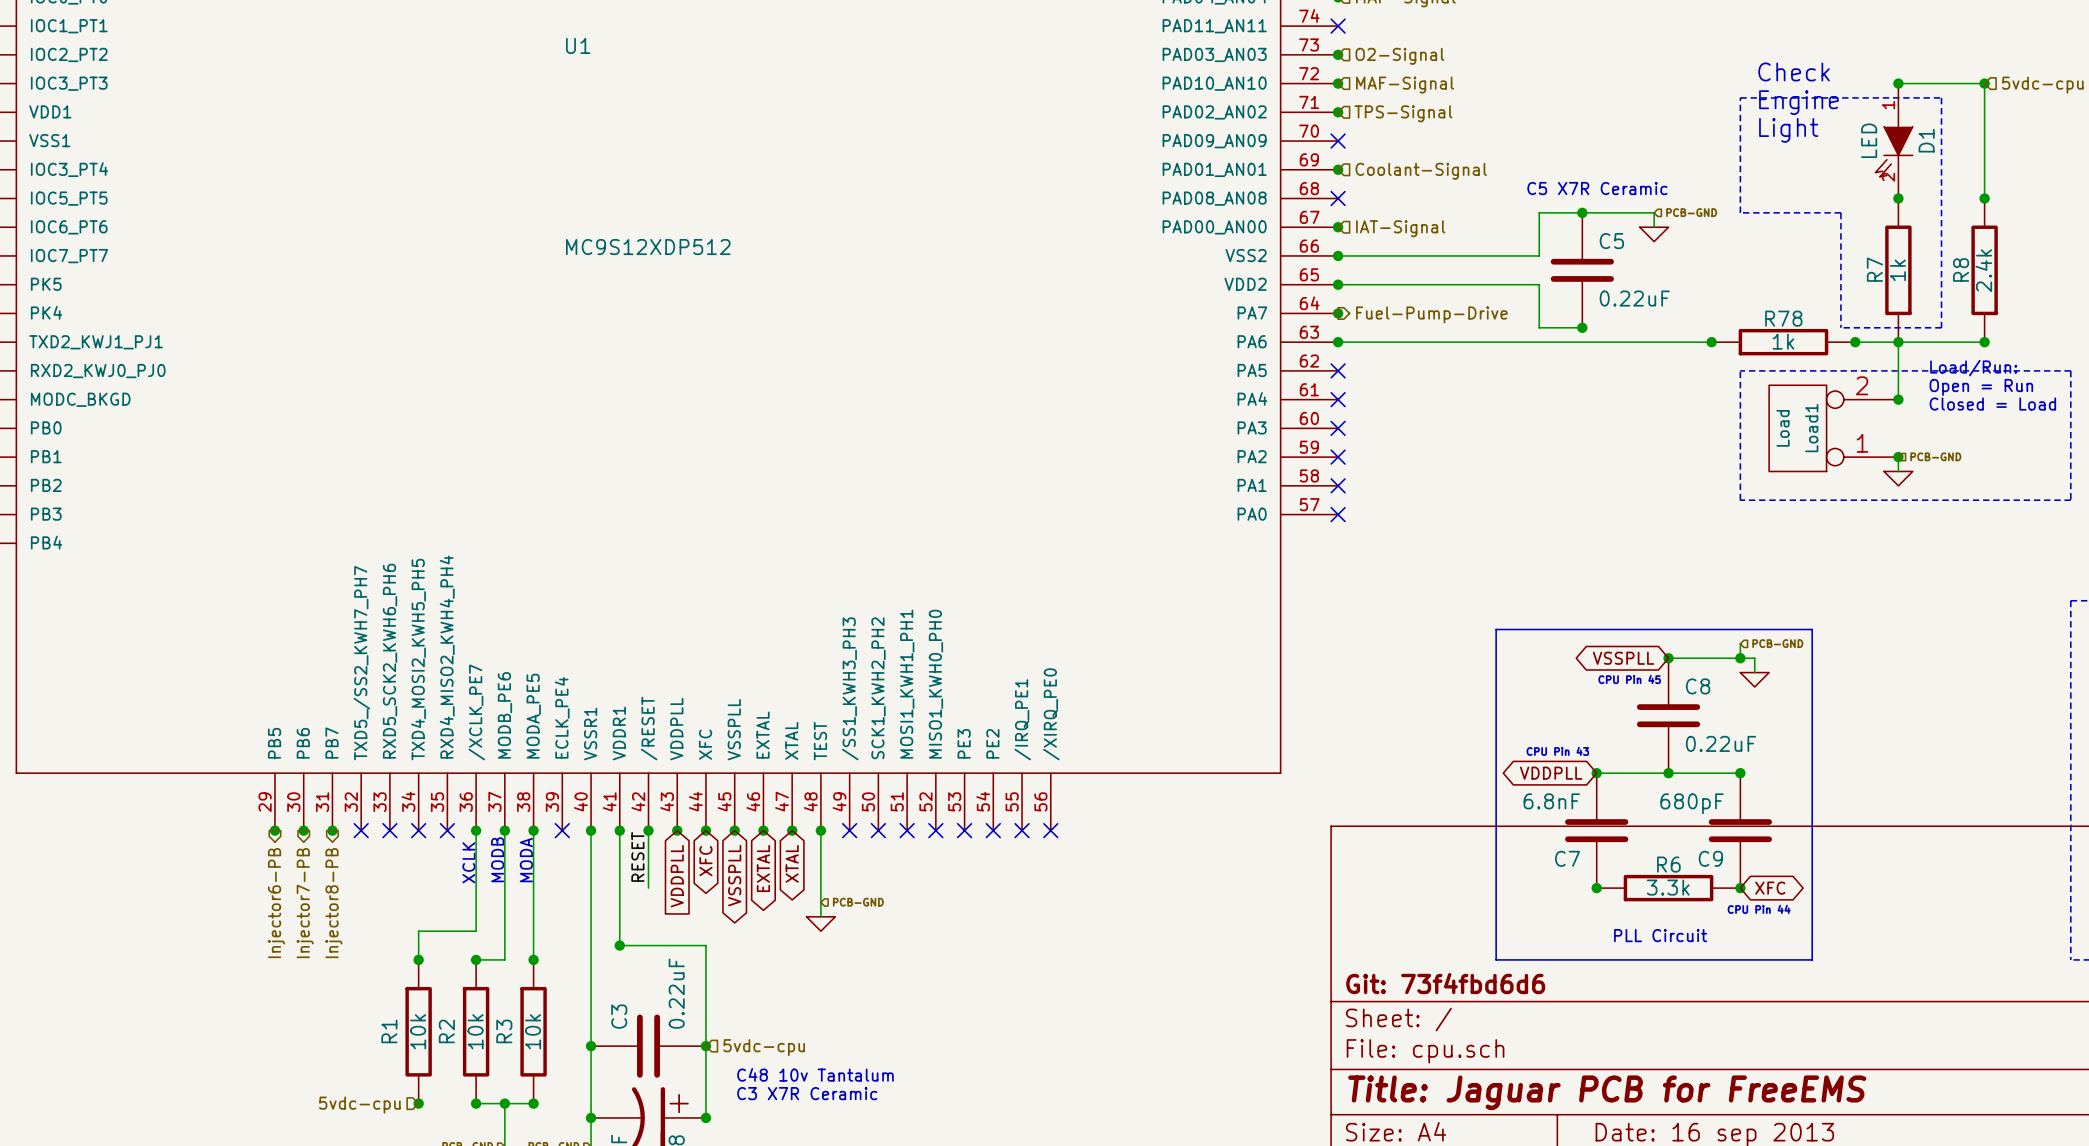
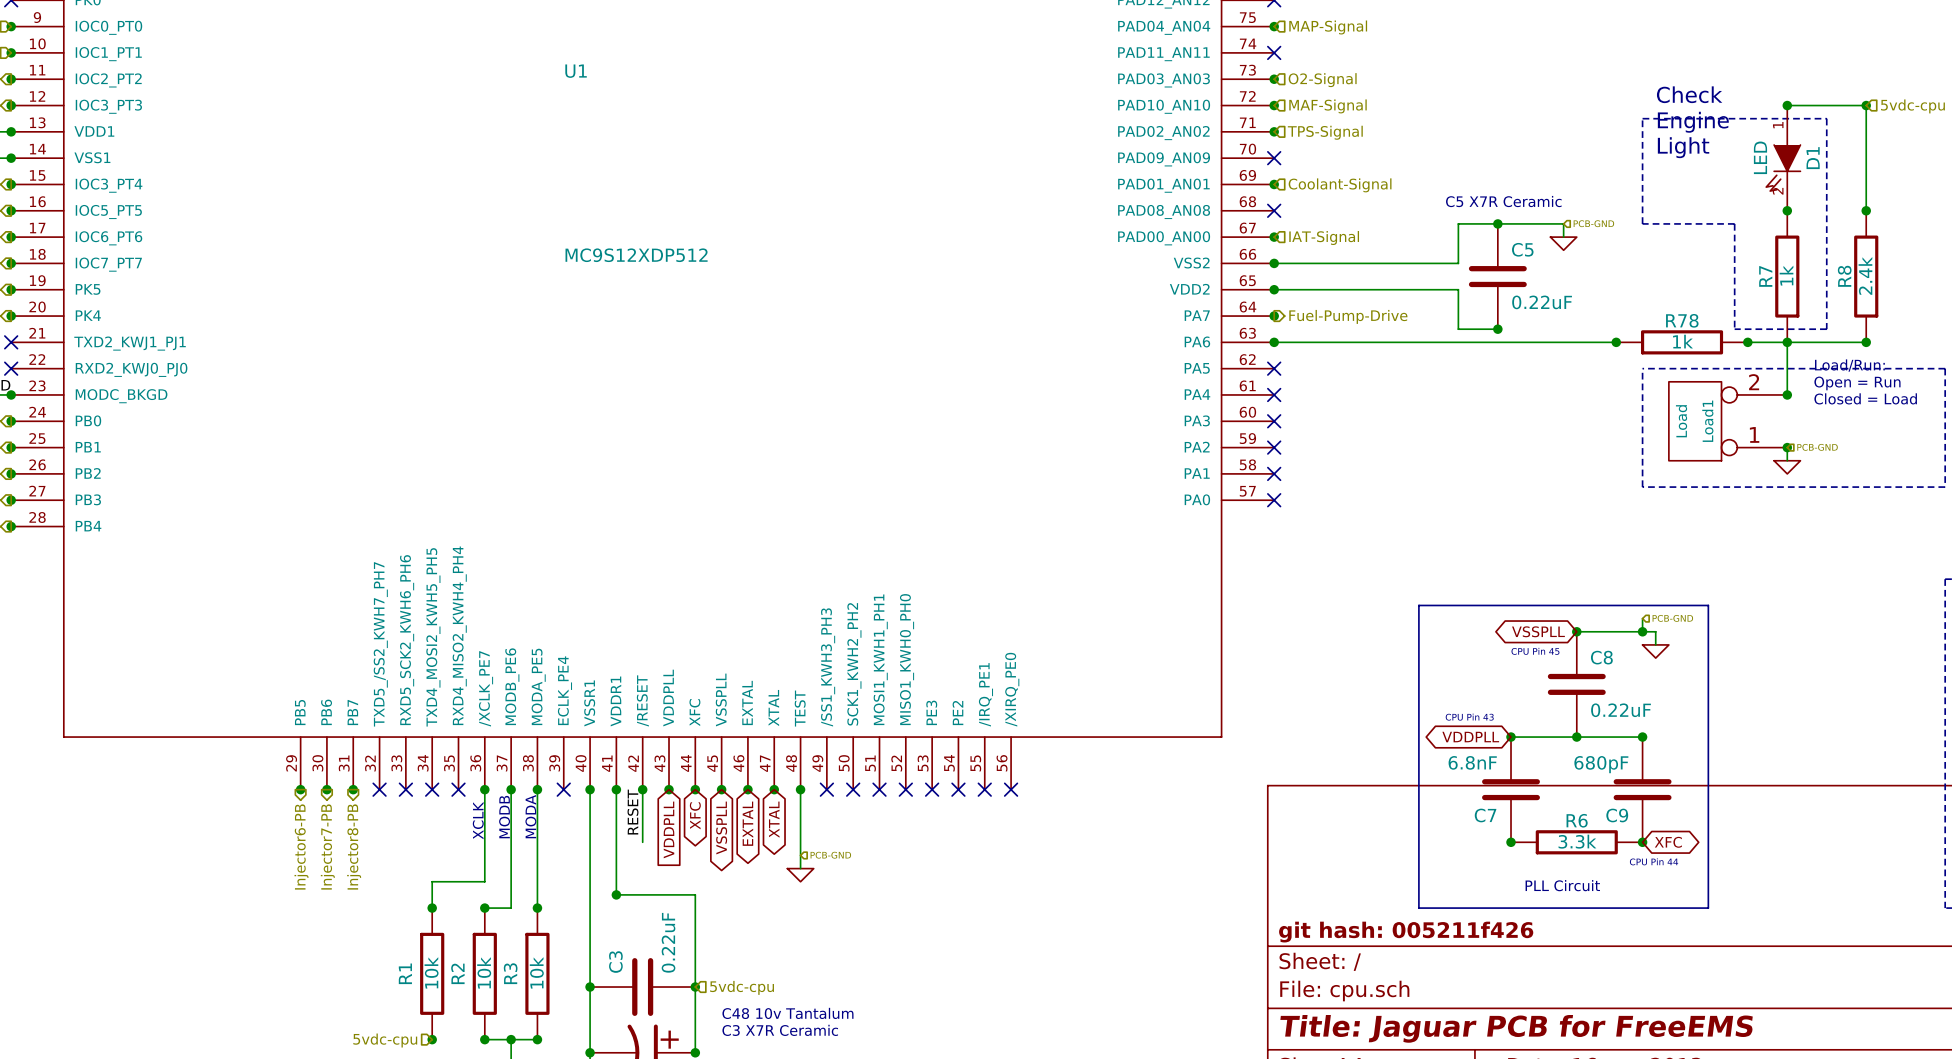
title block: Git: 73f4fbd6d6 (1445, 983) -> git hash: 005211f426 (1406, 932)

